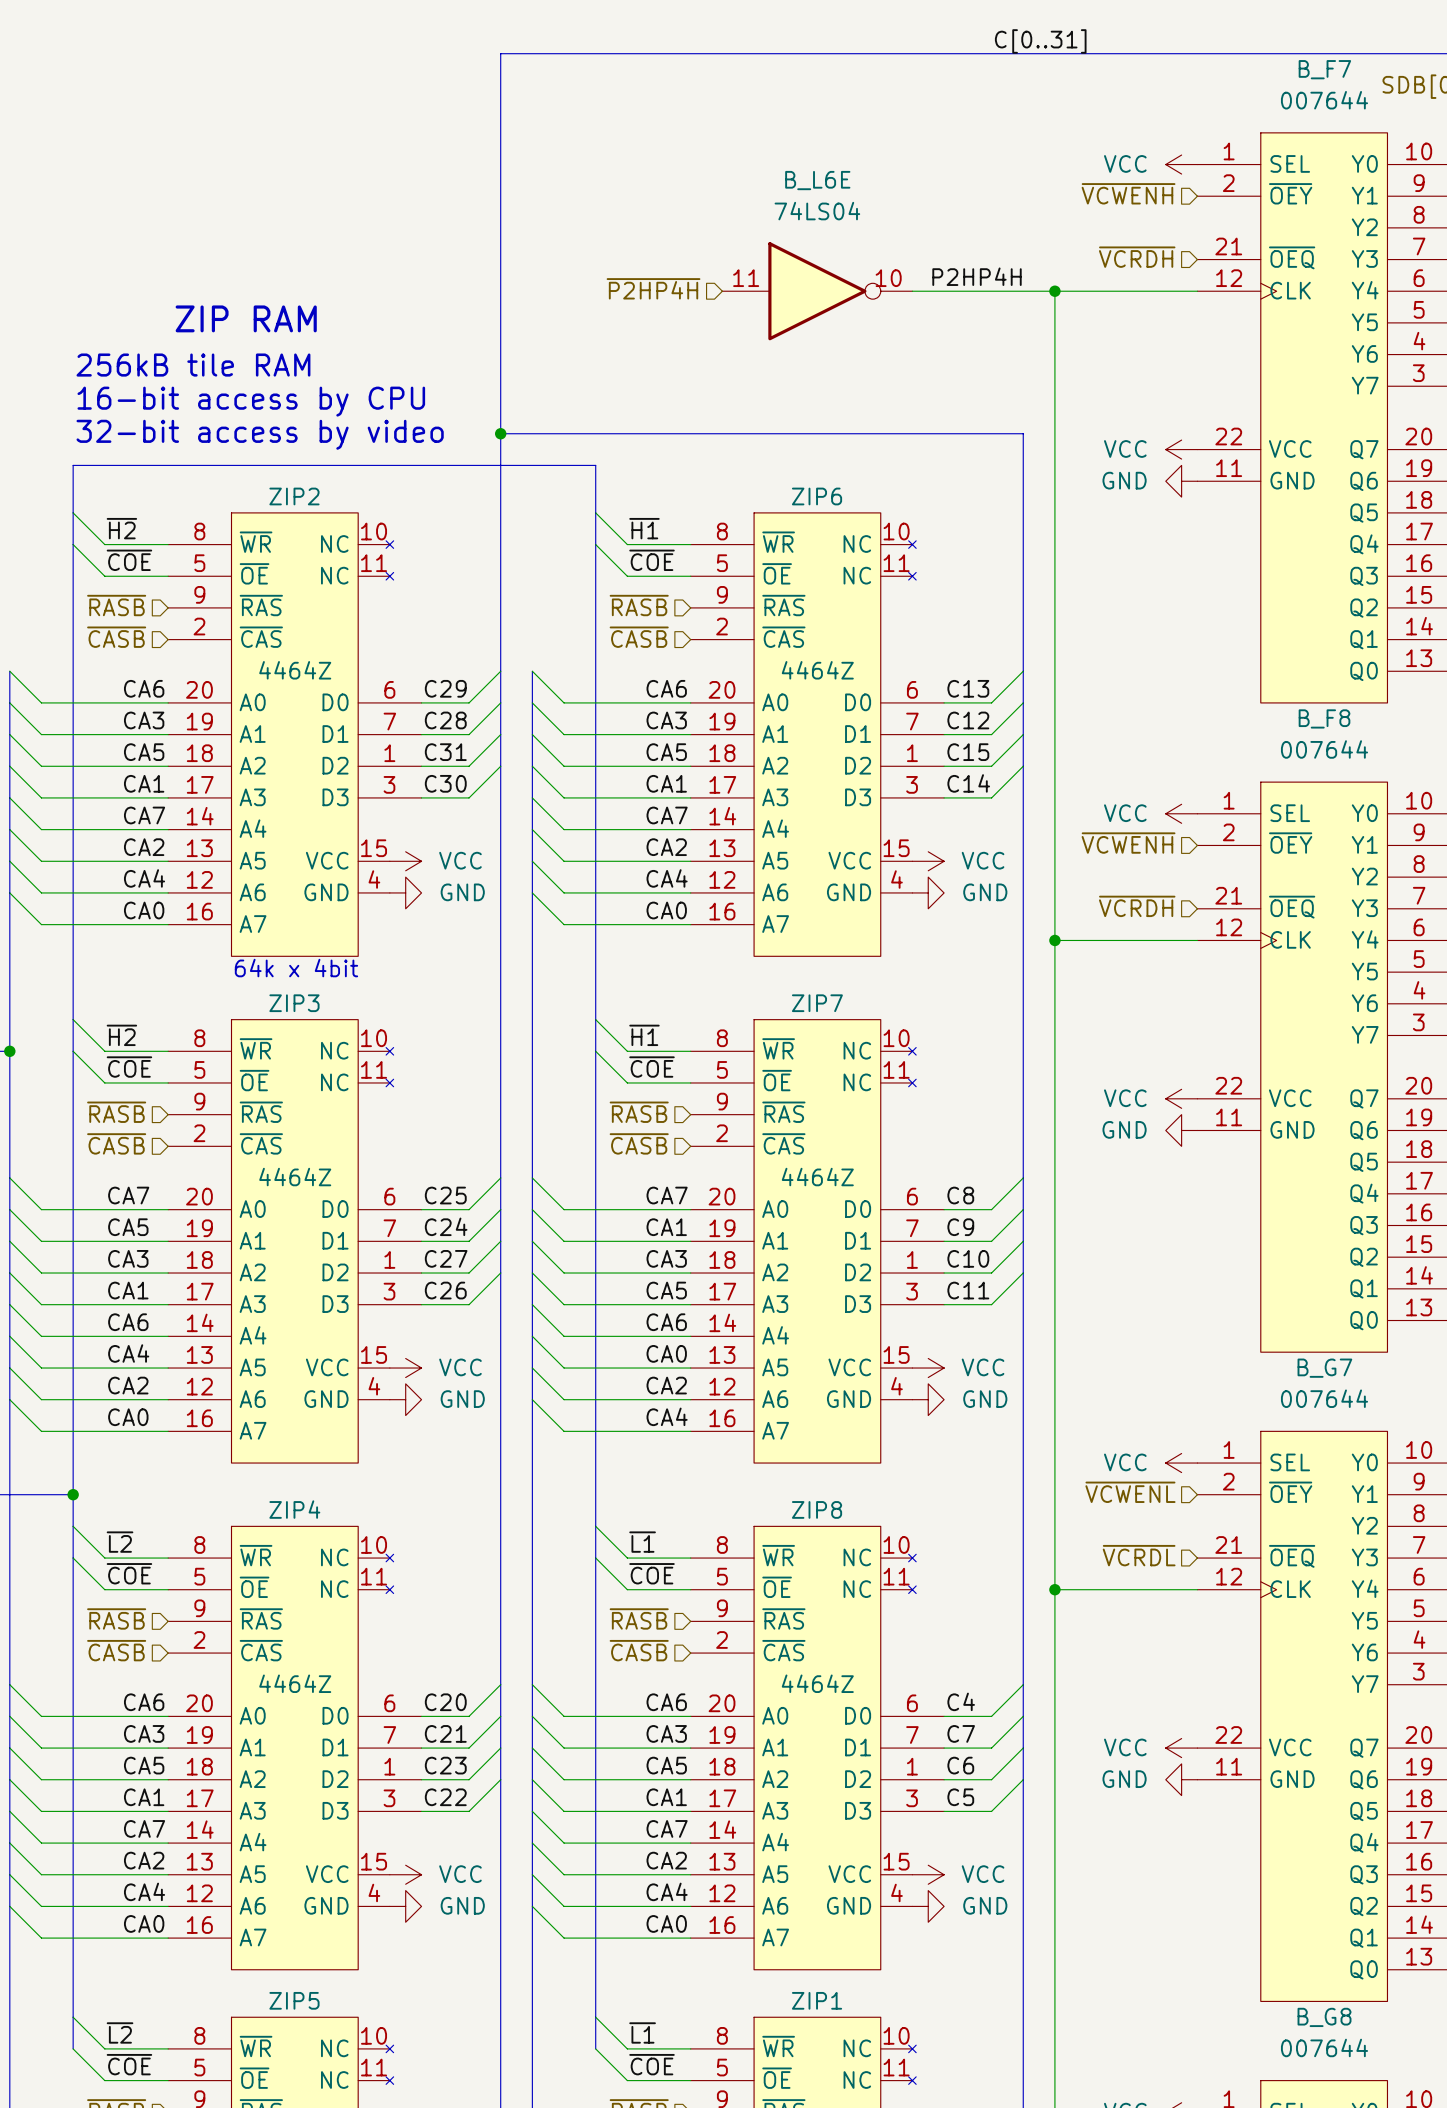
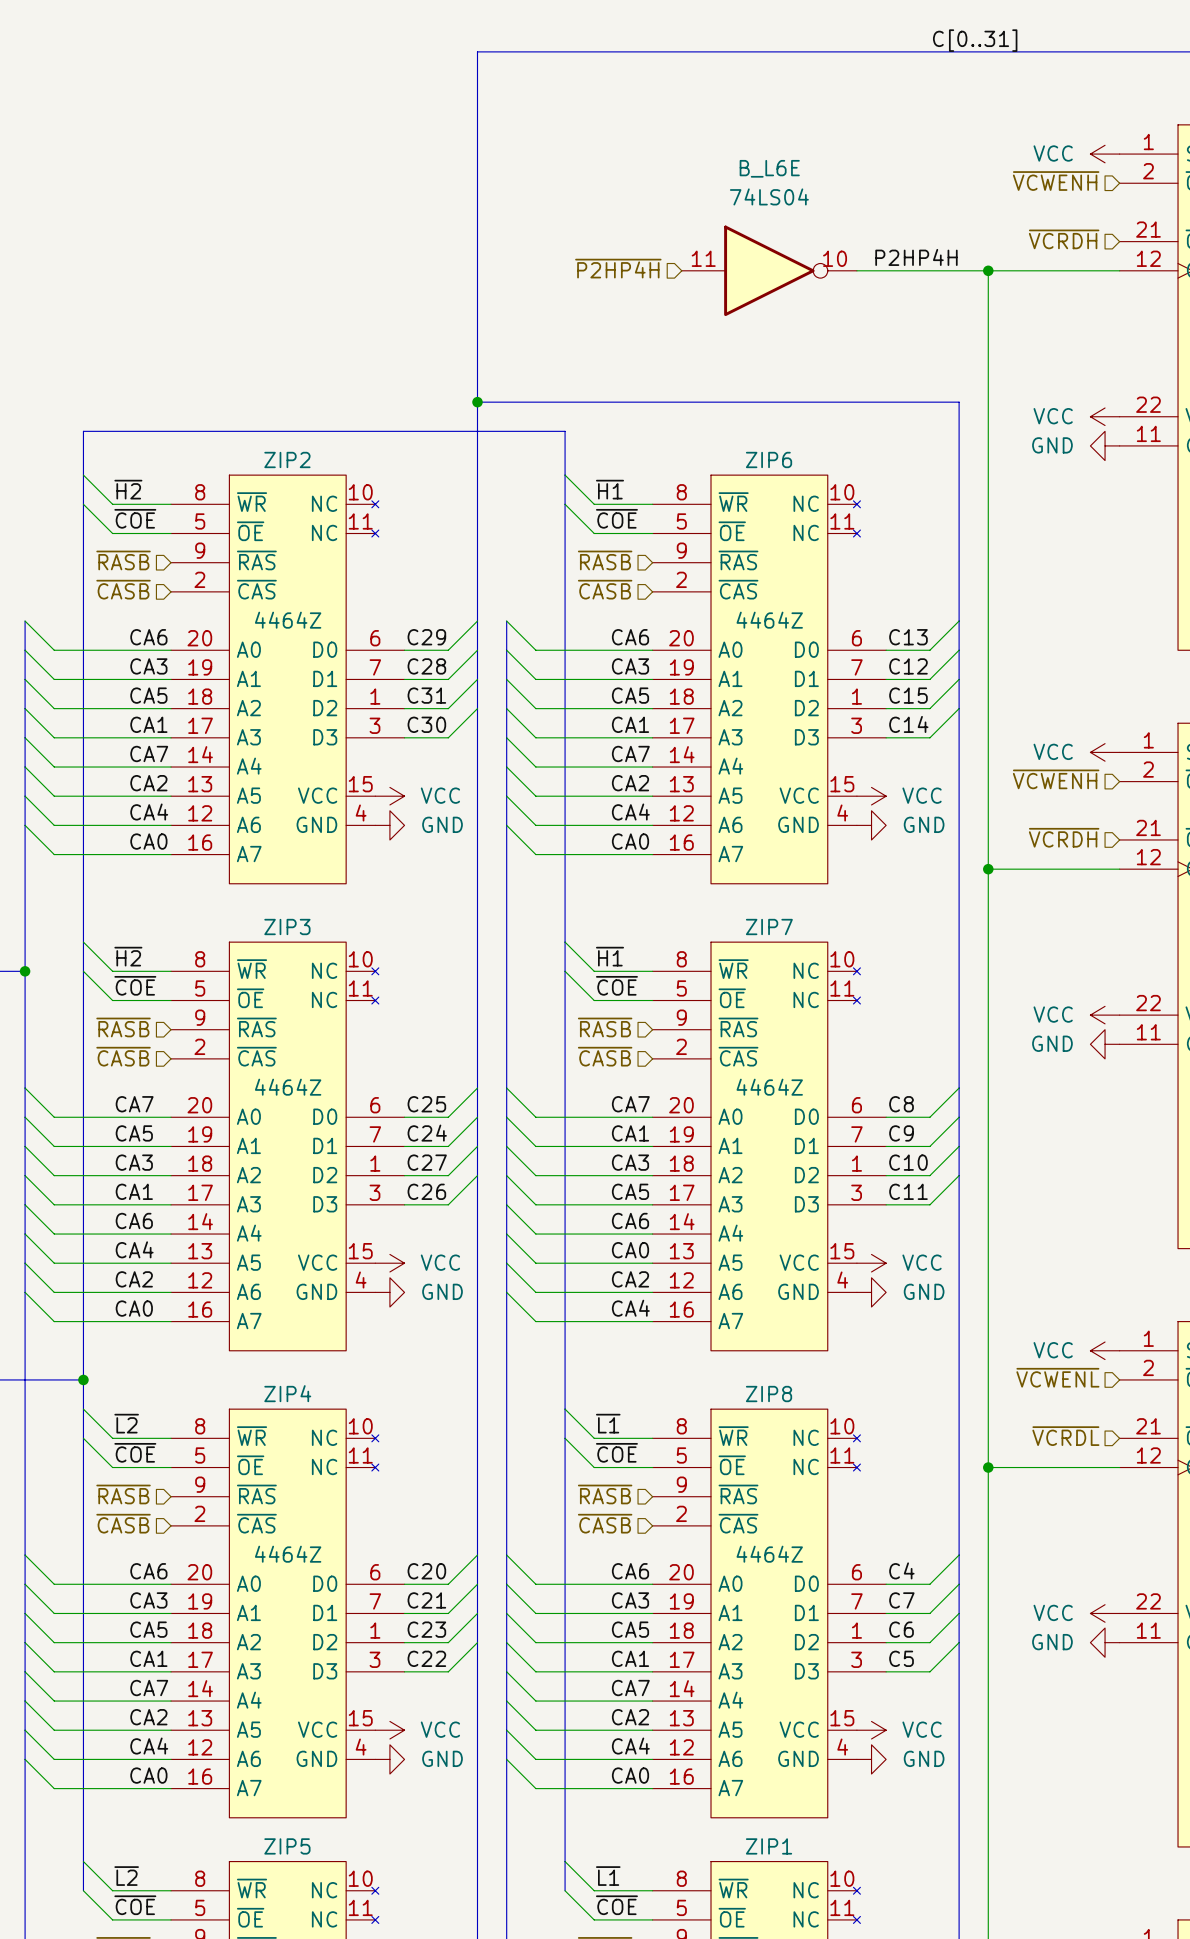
text: ZIP RAM (246, 318) -> none
text: 256kB tile RAM (193, 365) -> none
text: 16-bit access by CPU (251, 401) -> none
text: 32-bit access by video (260, 434) -> none
text: 64k x 4bit (296, 968) -> none

